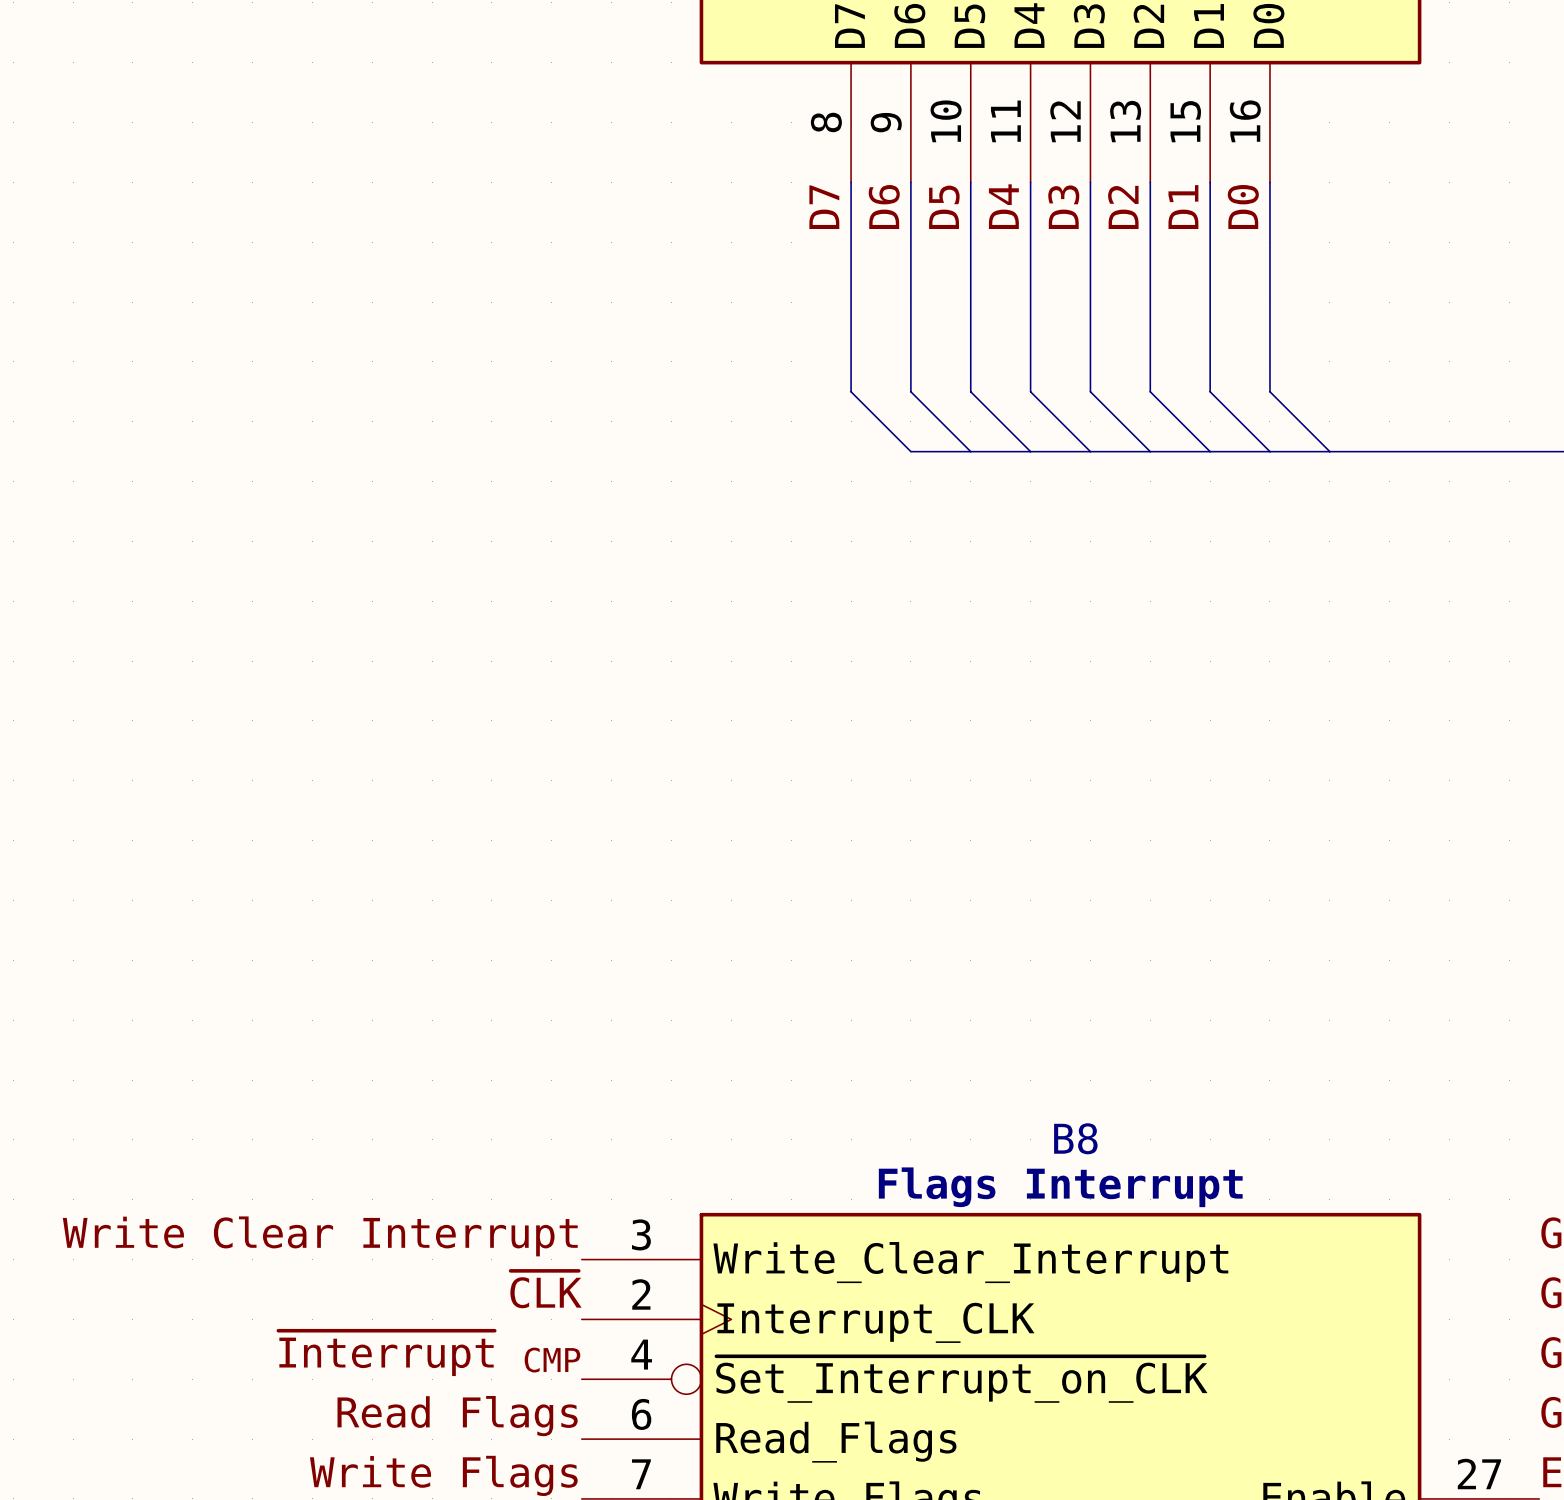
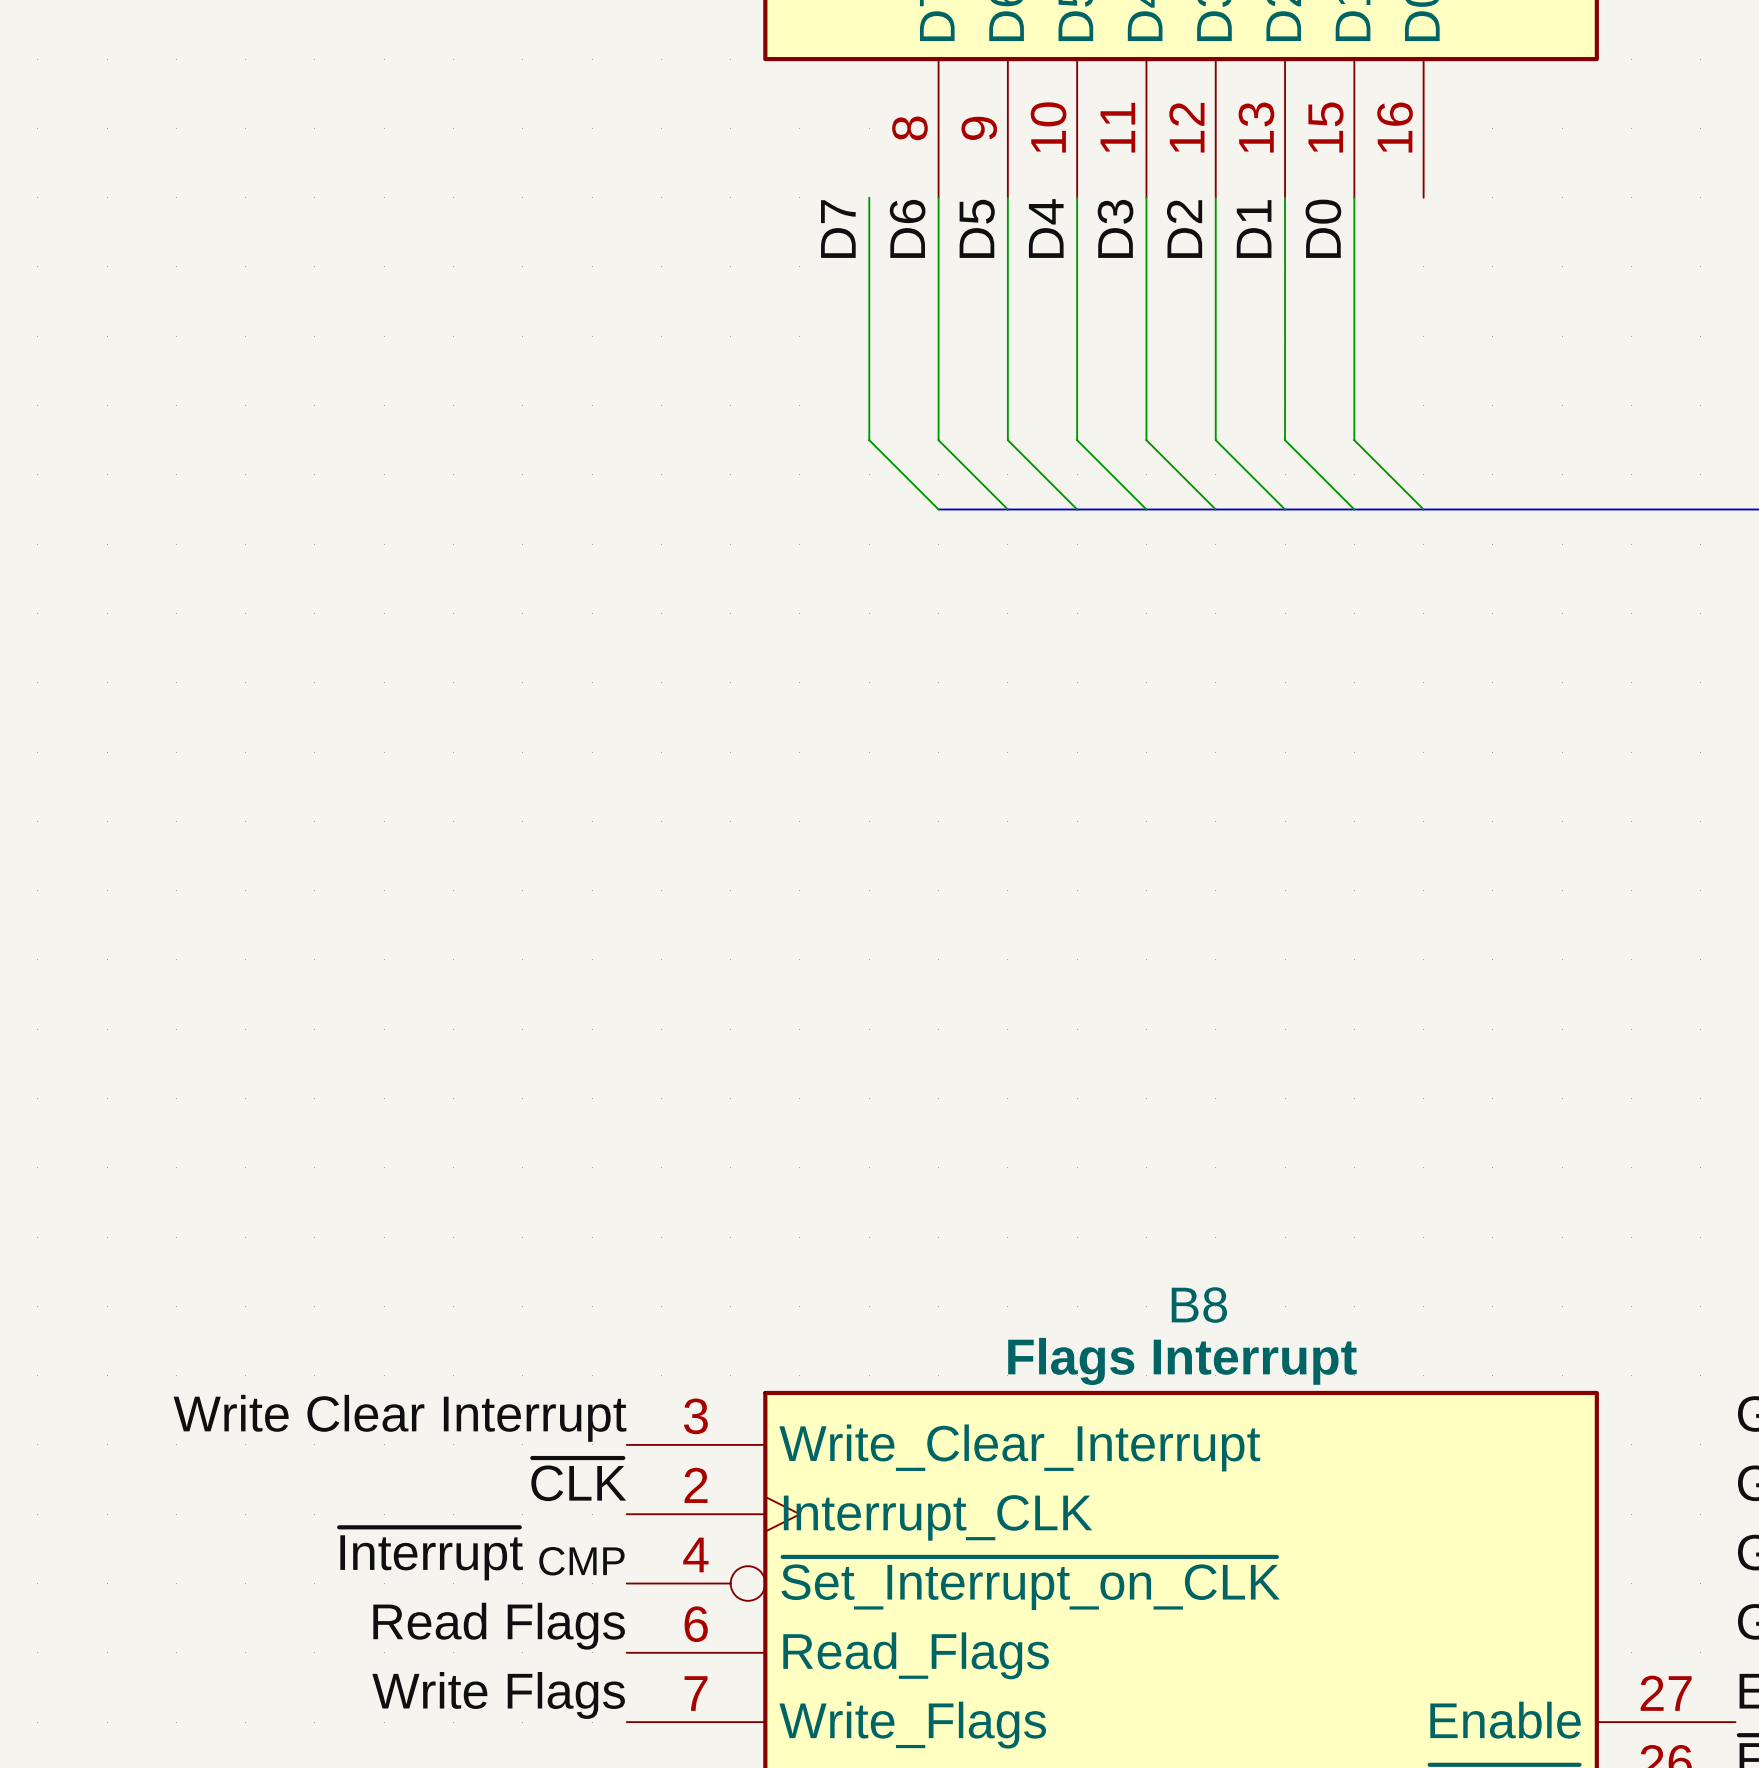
wire: (1269, 182) (1269, 391) (1329, 451) -> (869, 197) (869, 440) (938, 509)
label: D4 (1003, 206) -> D3 (1115, 228)
label: none -> D7 (838, 229)
label: D7 (824, 207) -> D6 (907, 228)
label: D6 (884, 207) -> D5 (977, 228)
label: D5 (944, 207) -> D4 (1046, 228)
label: D3 (1063, 207) -> D2 (1184, 229)
label: D2 (1123, 207) -> D1 (1254, 229)
label: D1 (1183, 207) -> D0 (1323, 228)
label: D0 (1243, 207) -> none
bus: none -> (938, 509) (1007, 509)

